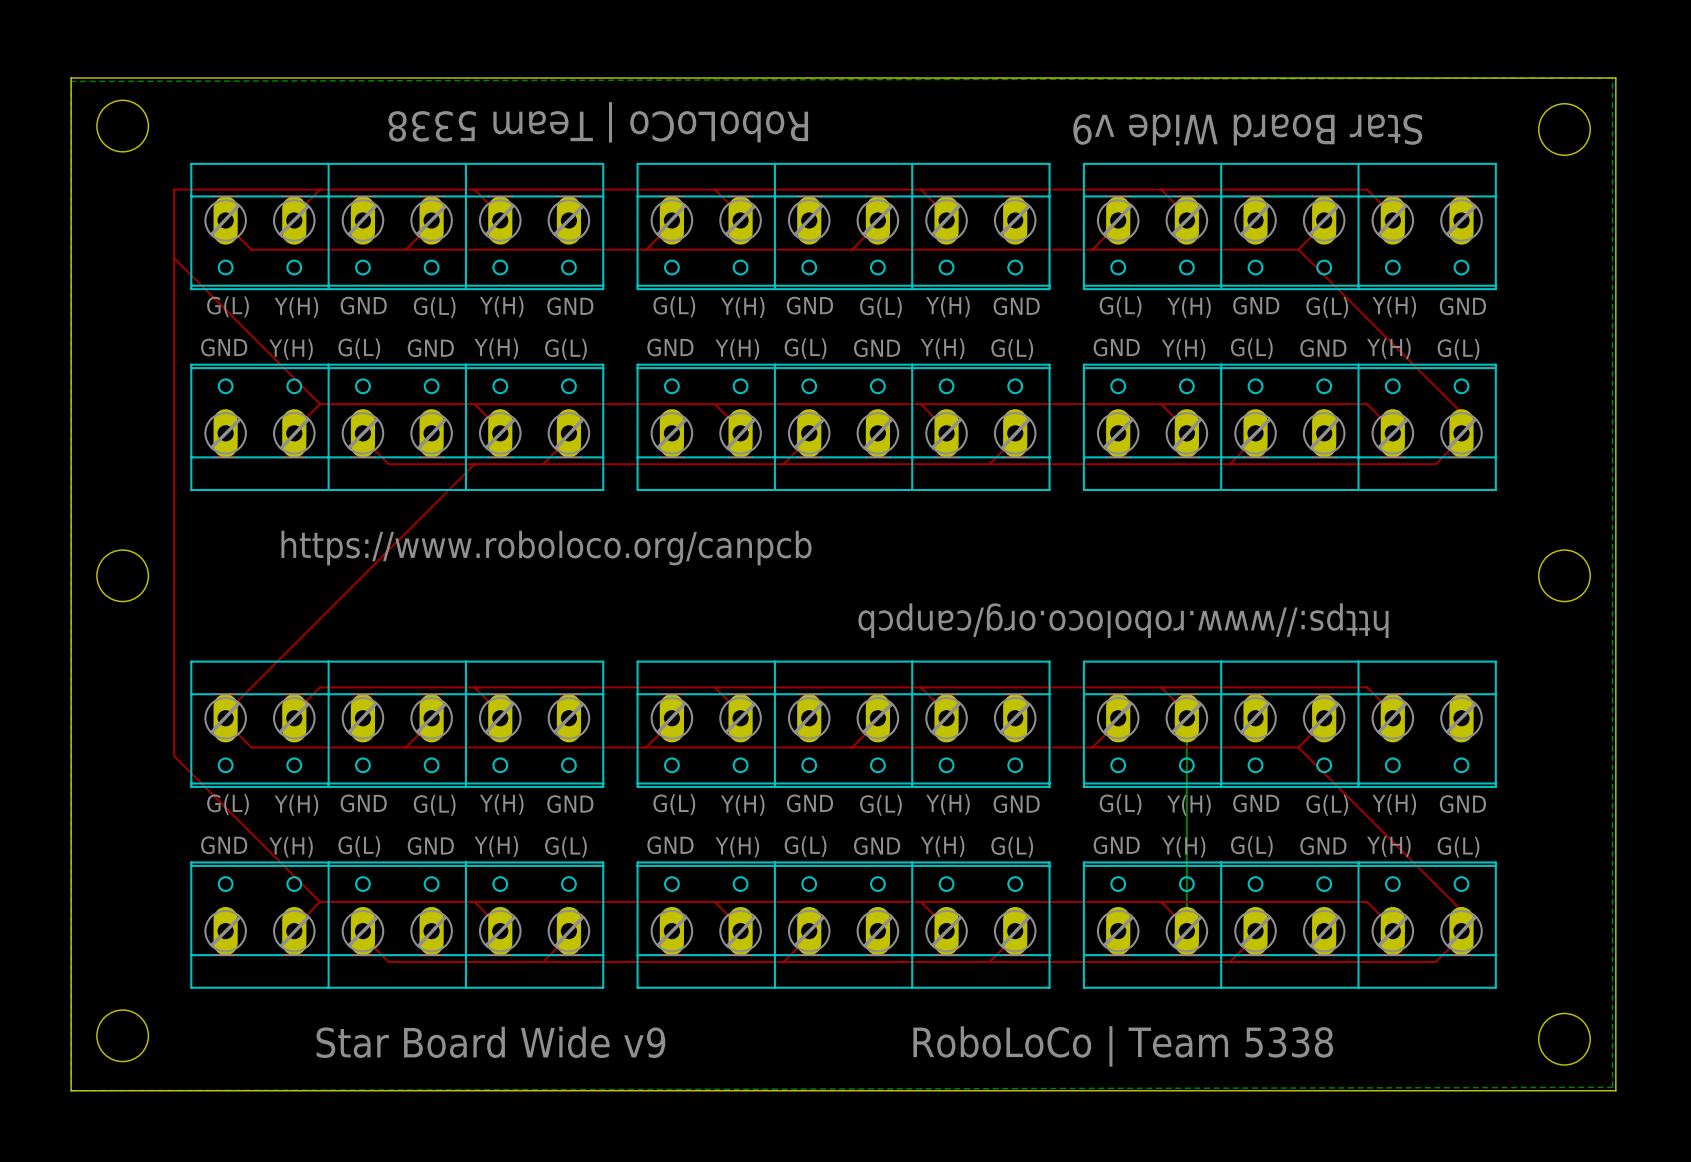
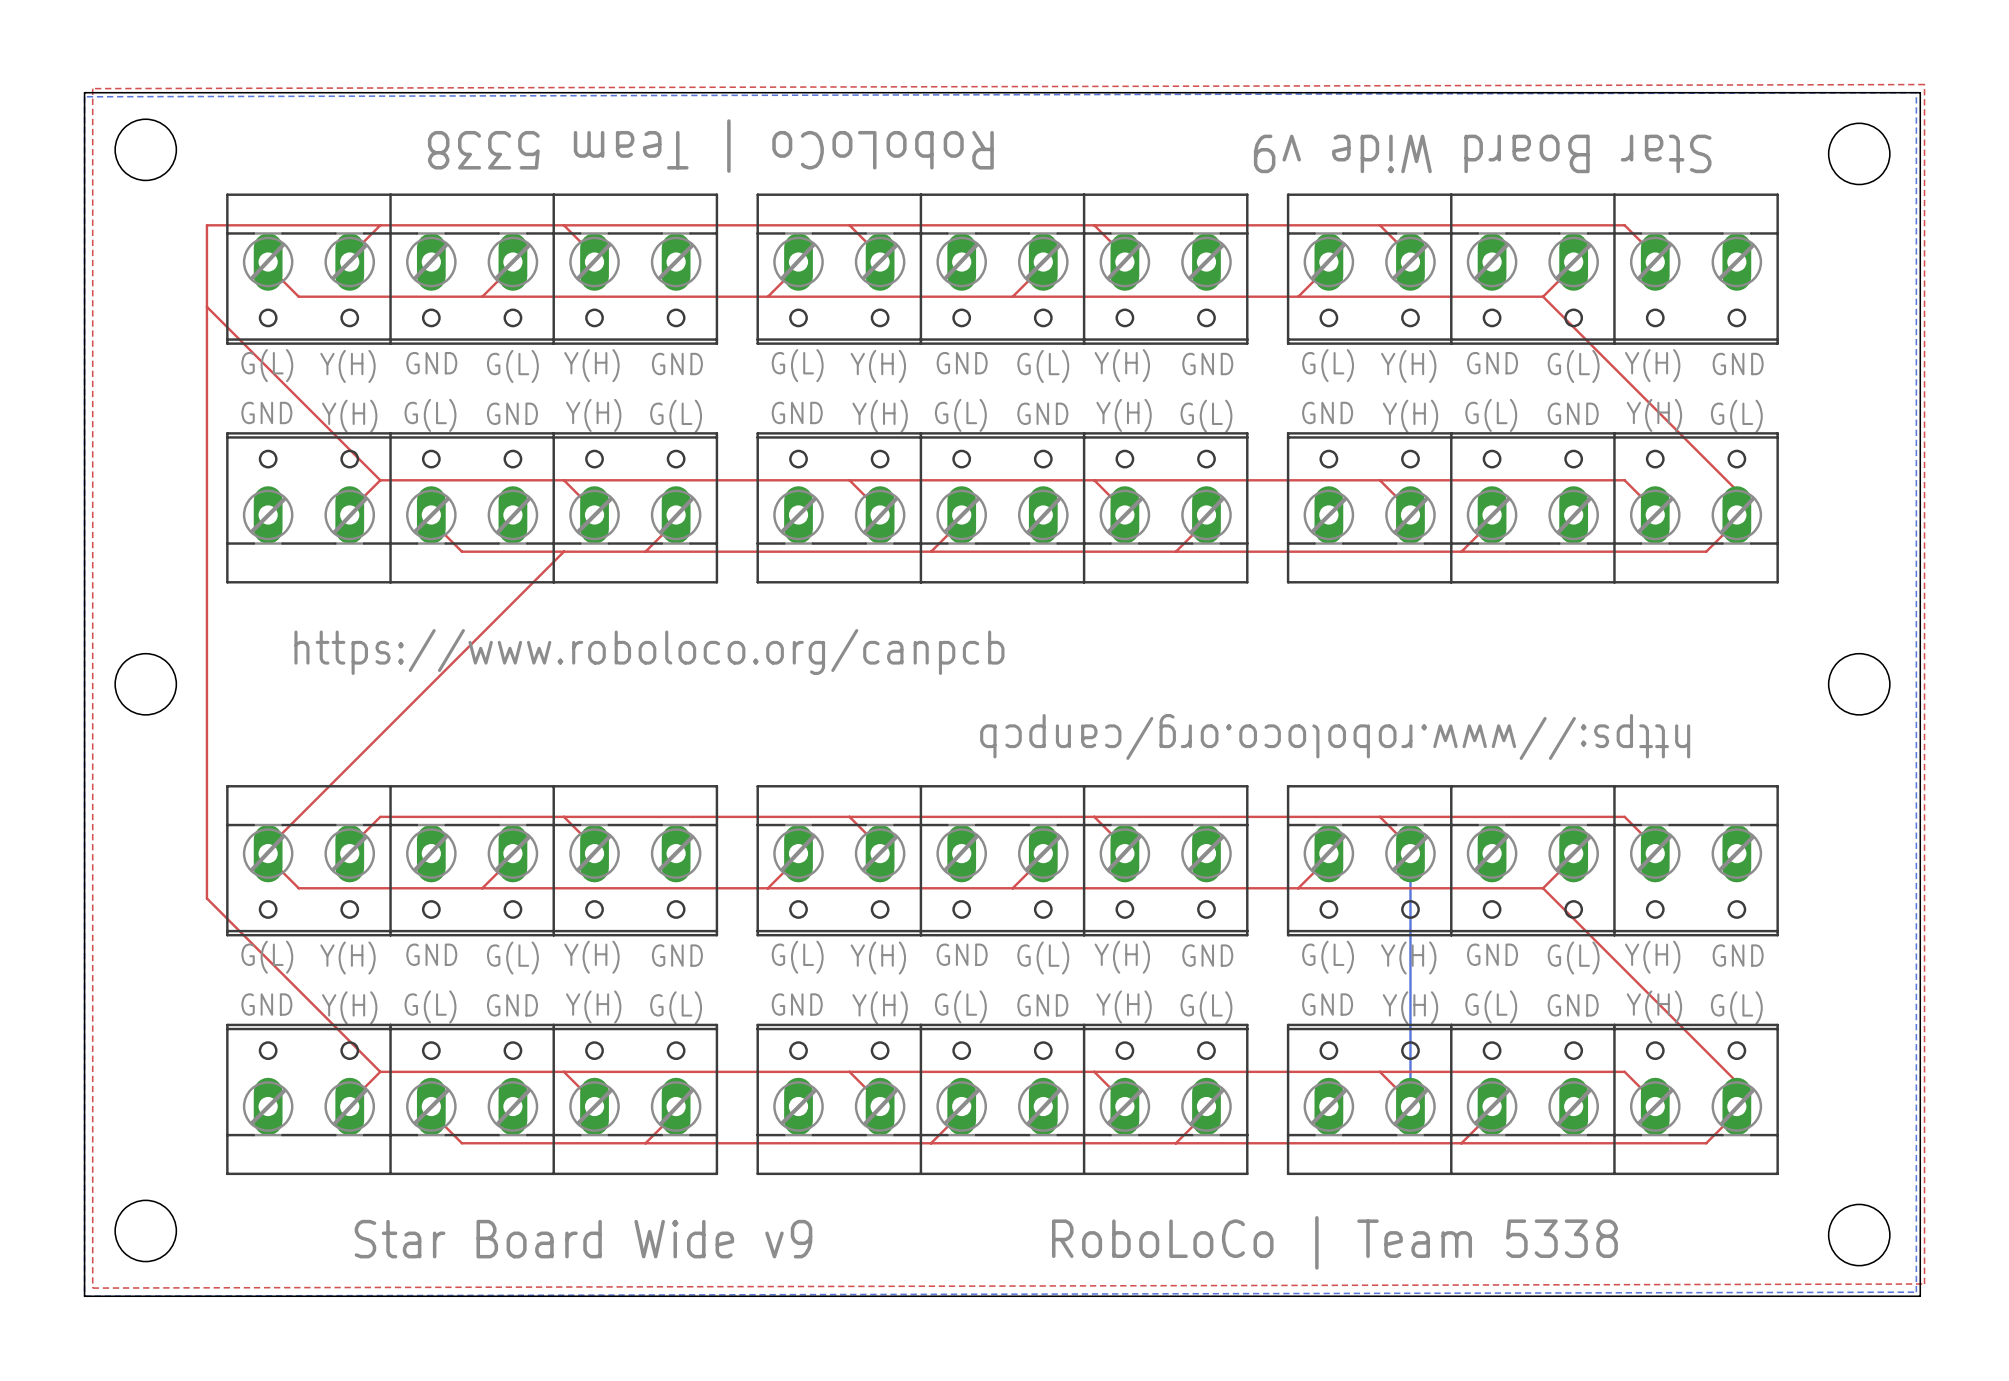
top zone outline: none -> (1924, 84) (1924, 1284) (92, 1288) (92, 88) (1924, 84)

